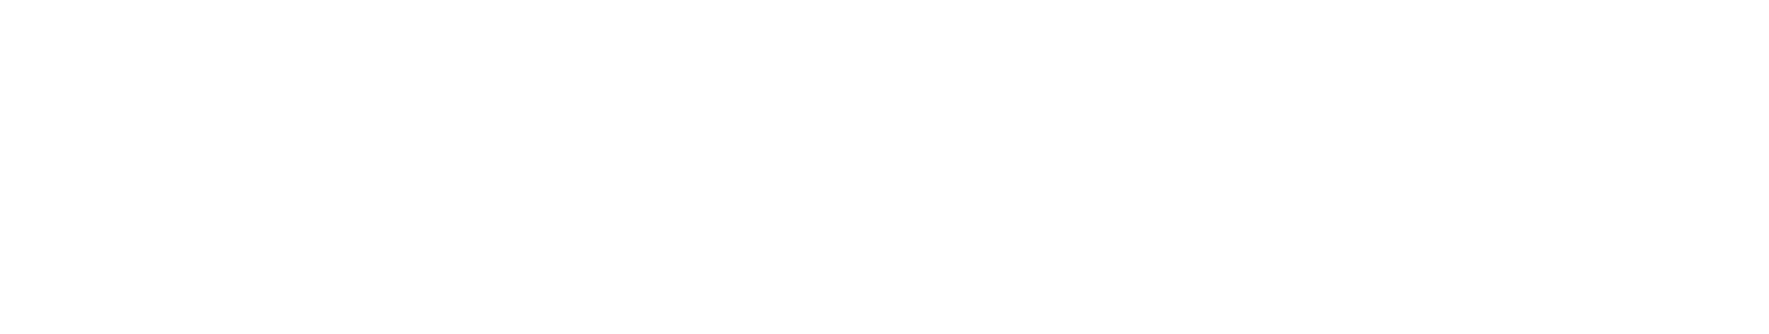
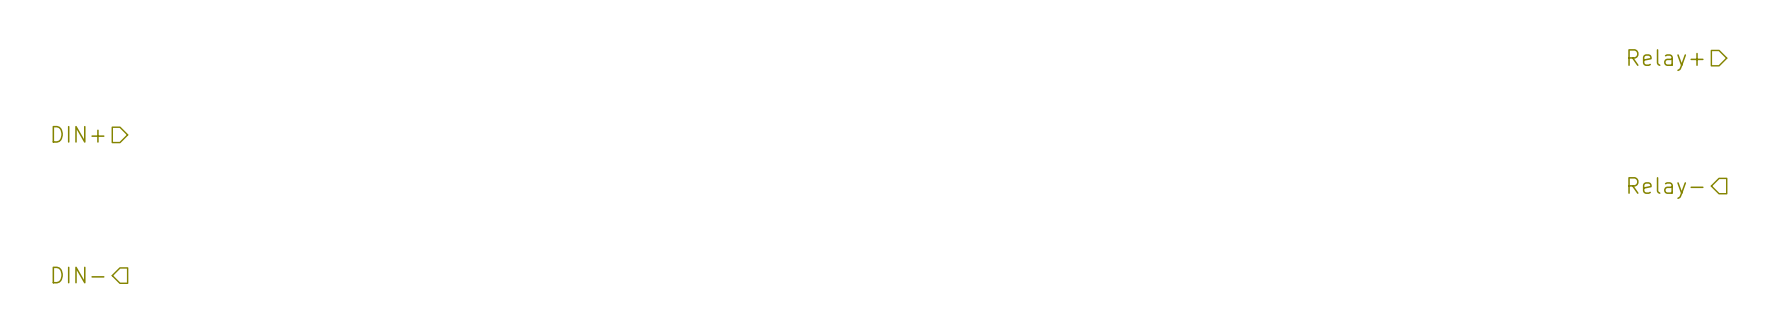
hierarchical label: none -> Relay+ (1665, 60)
hierarchical label: none -> DIN+ (78, 134)
hierarchical label: none -> Relay- (1665, 188)
hierarchical label: none -> DIN- (78, 275)

